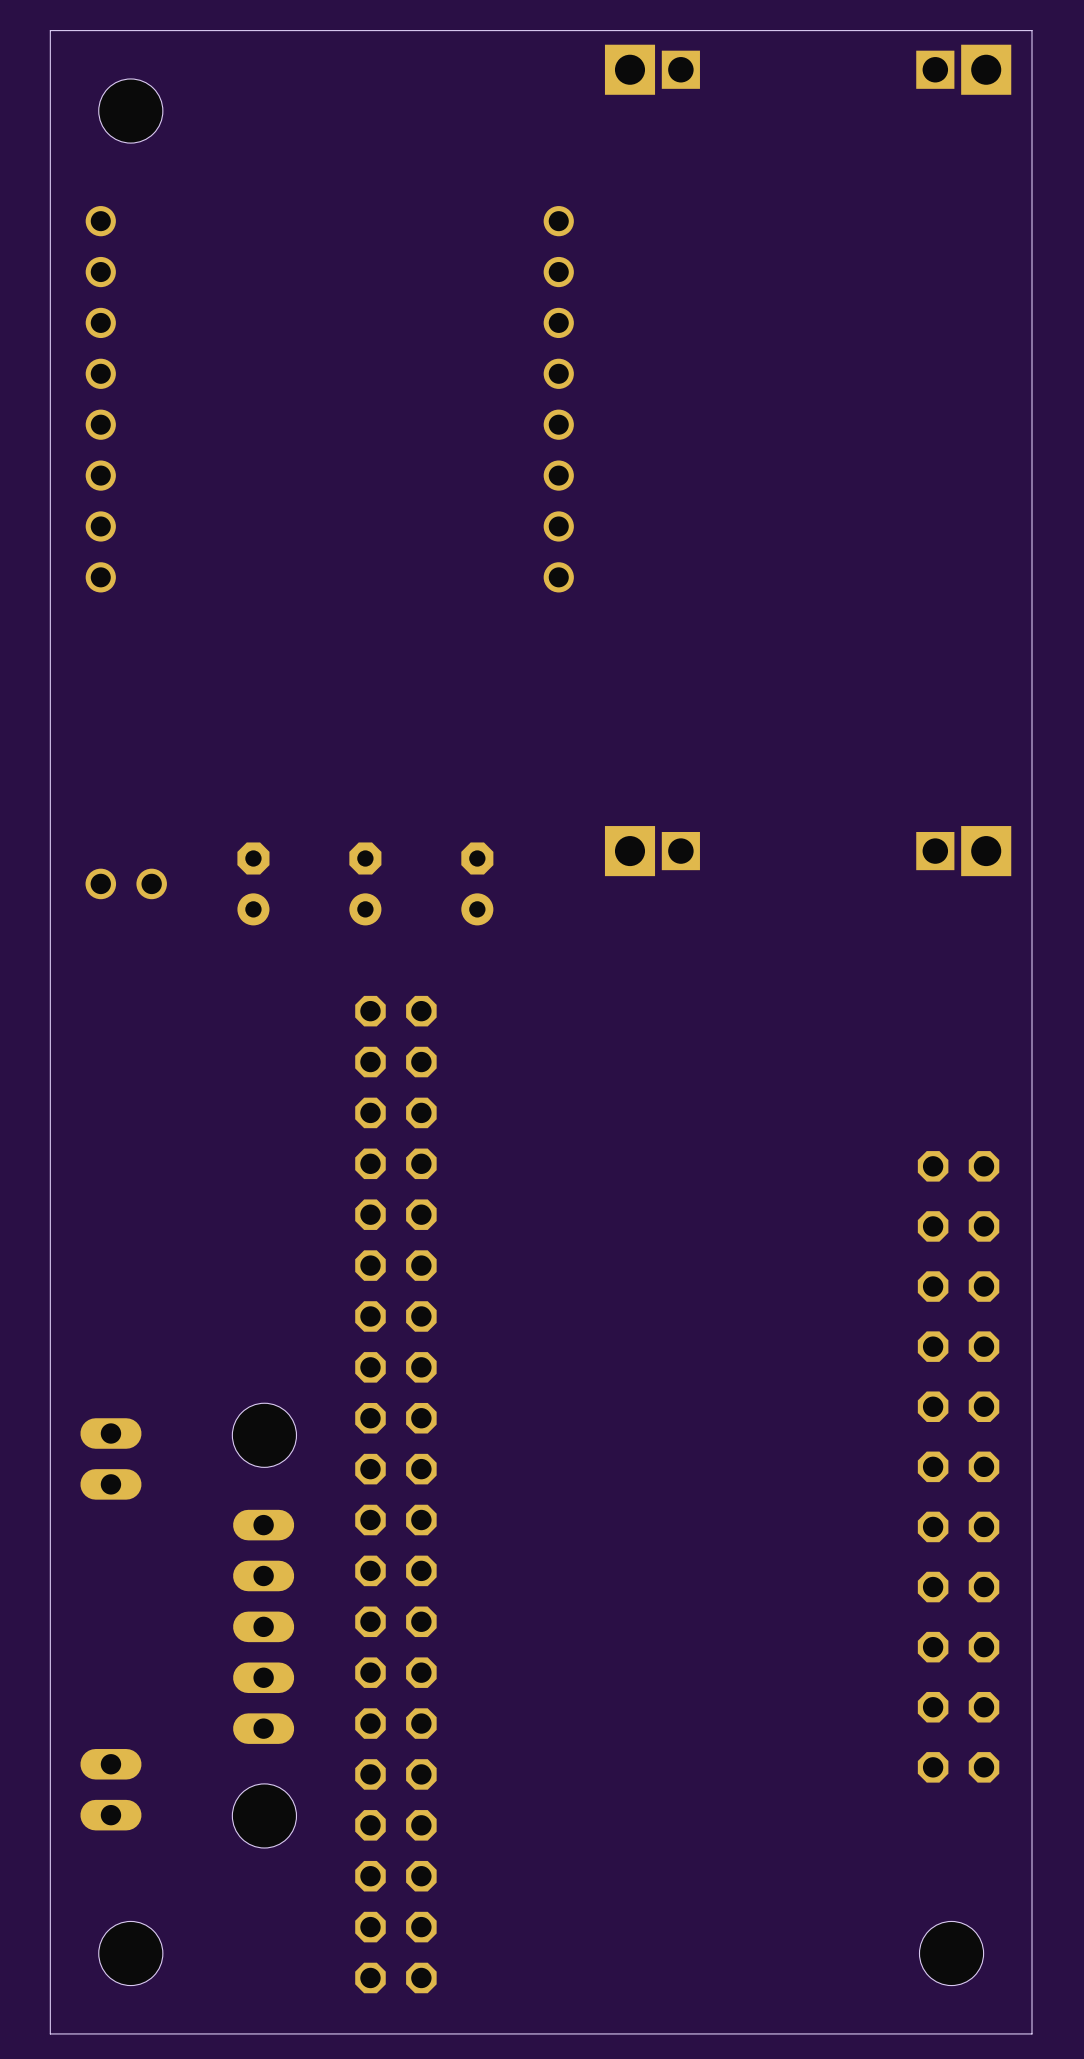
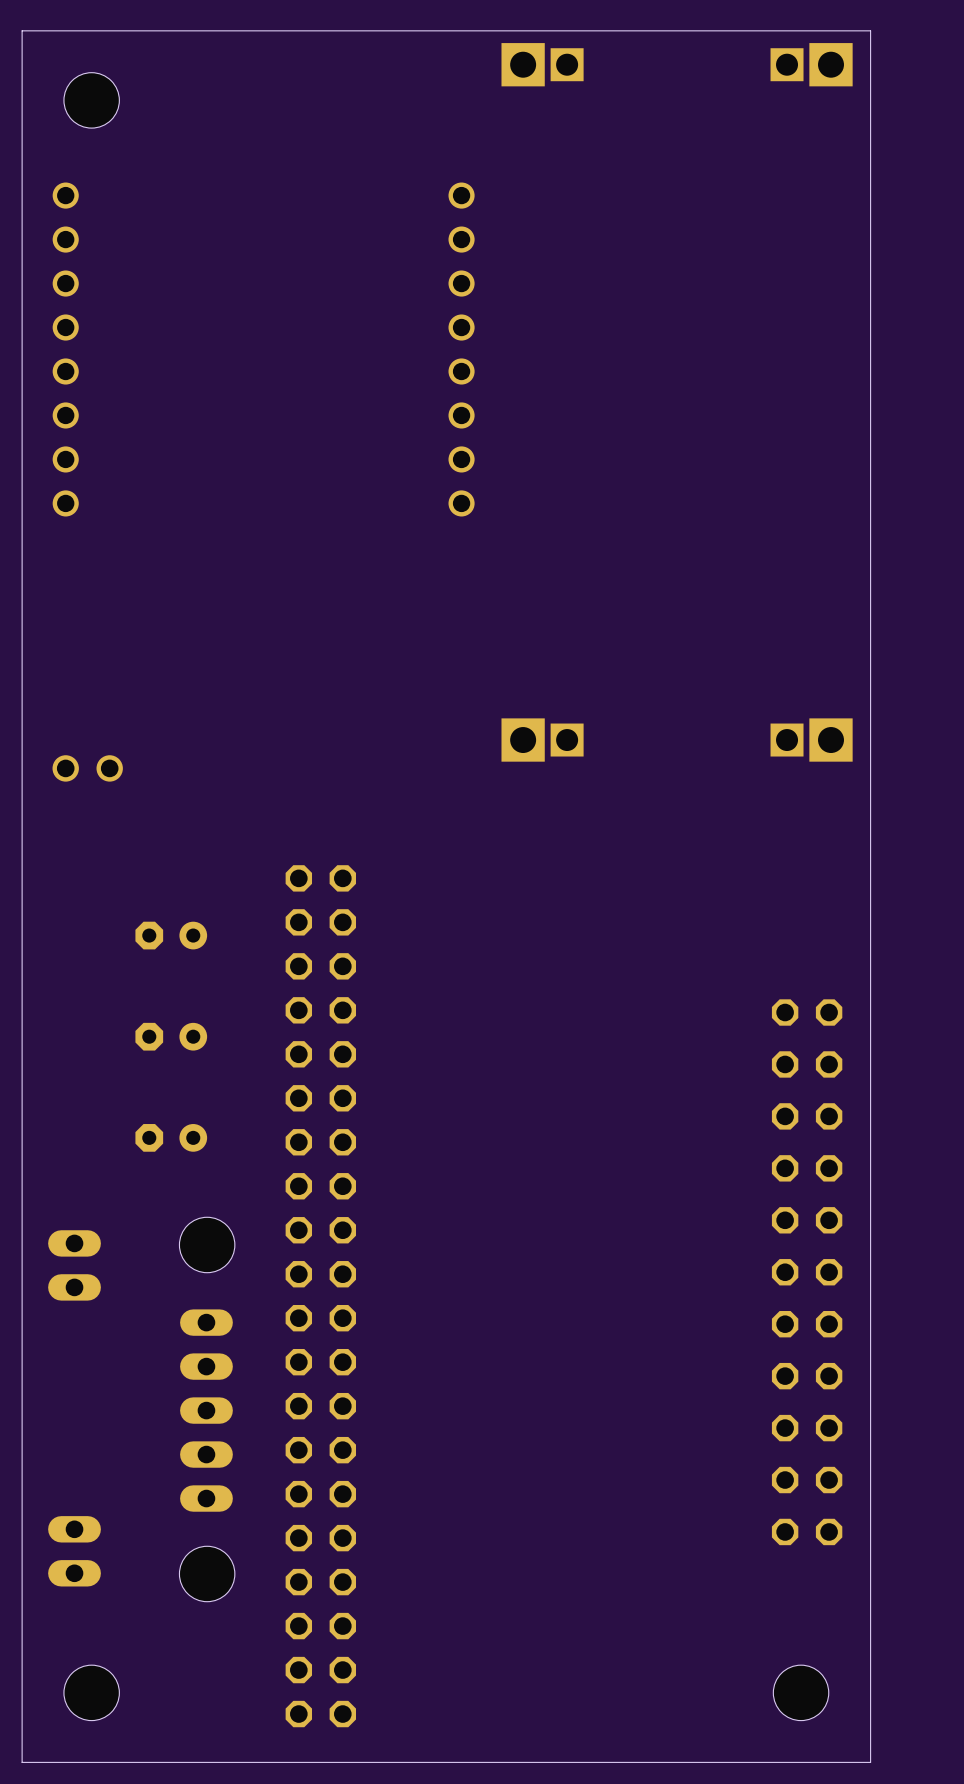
part: (253, 883) -> none
part: (365, 883) -> none
part: (477, 883) -> none
part: none -> (171, 935)
part: none -> (171, 1036)
part: none -> (171, 1137)

